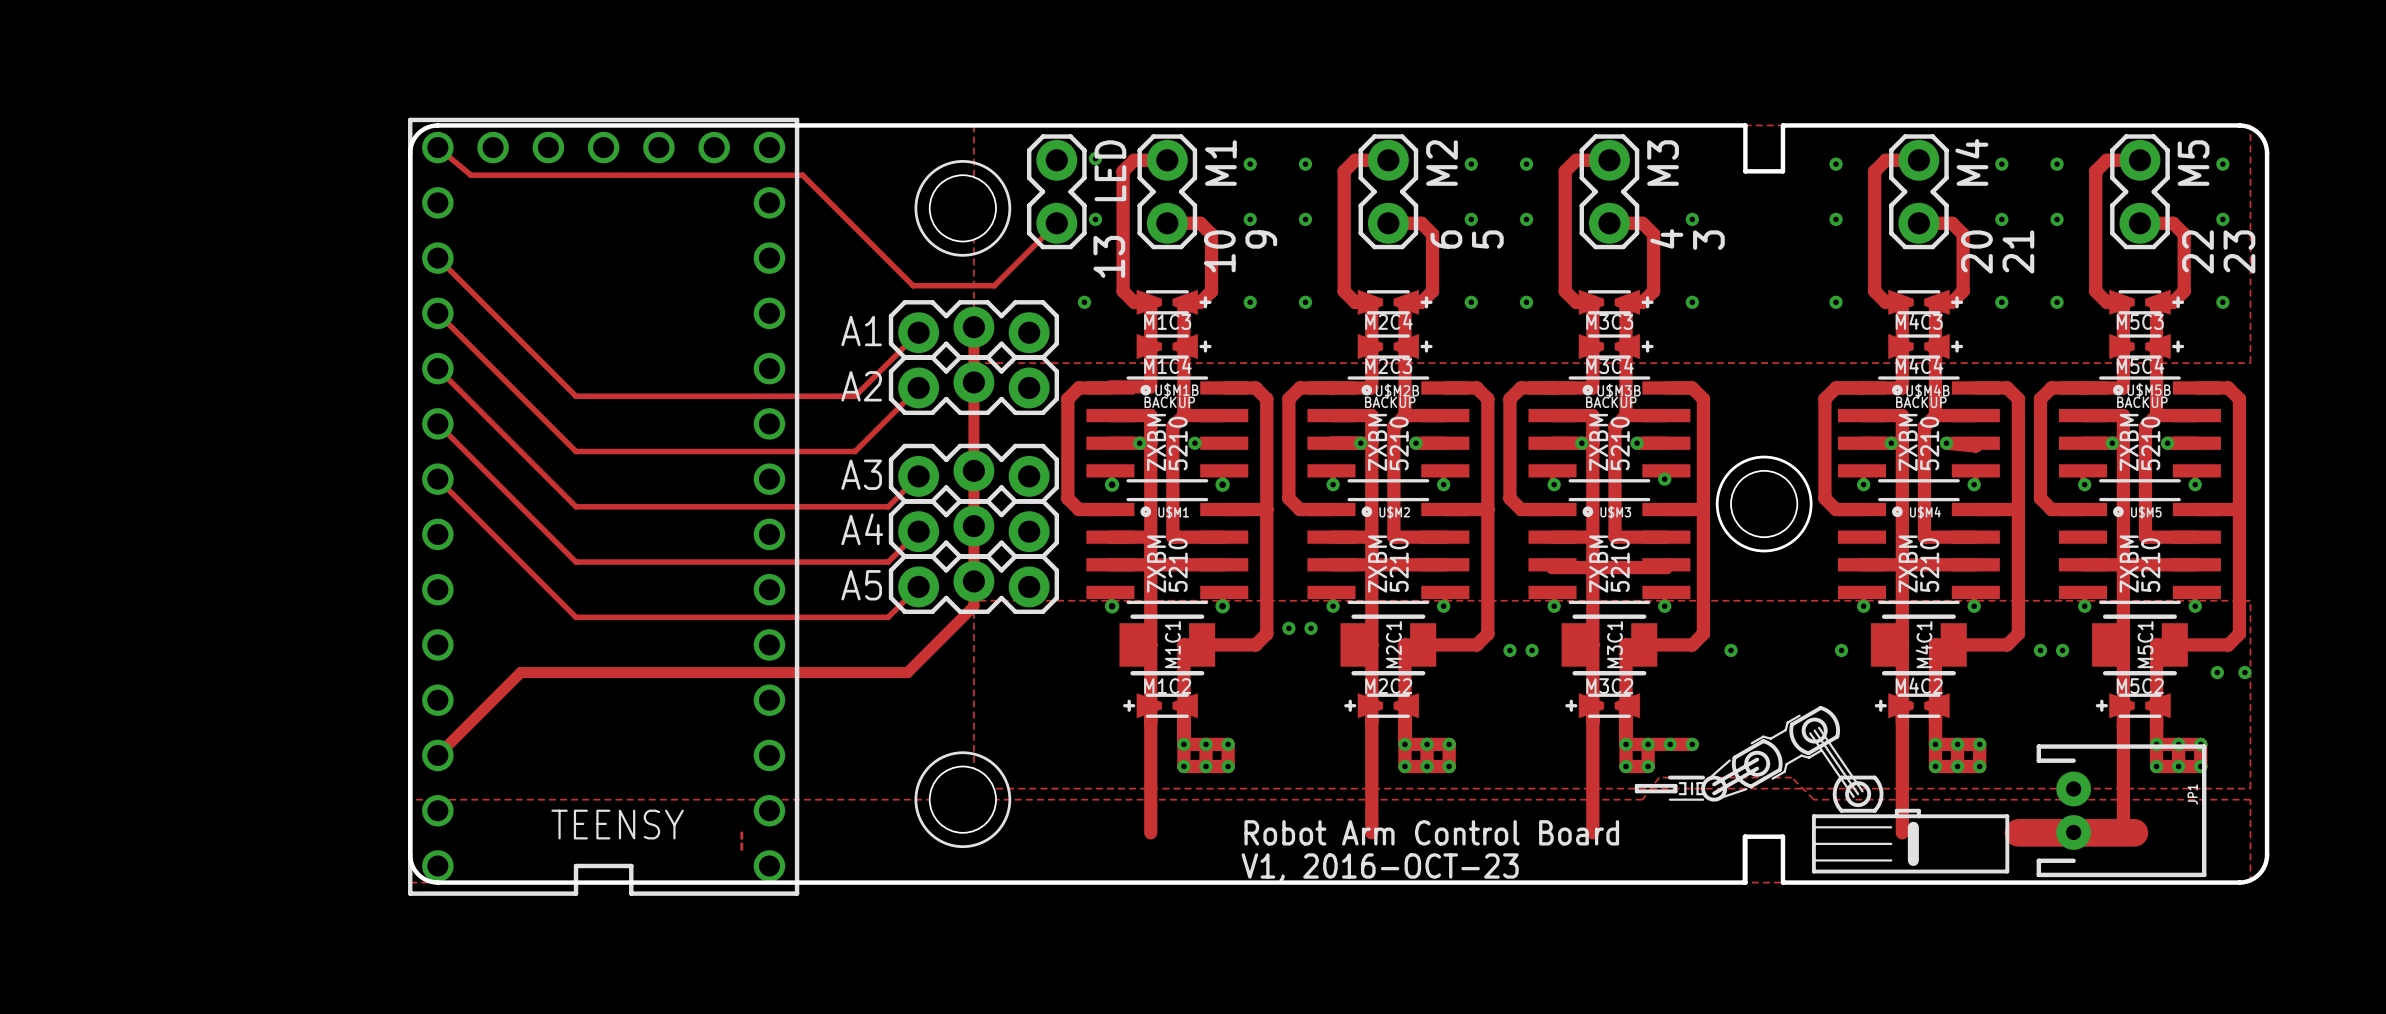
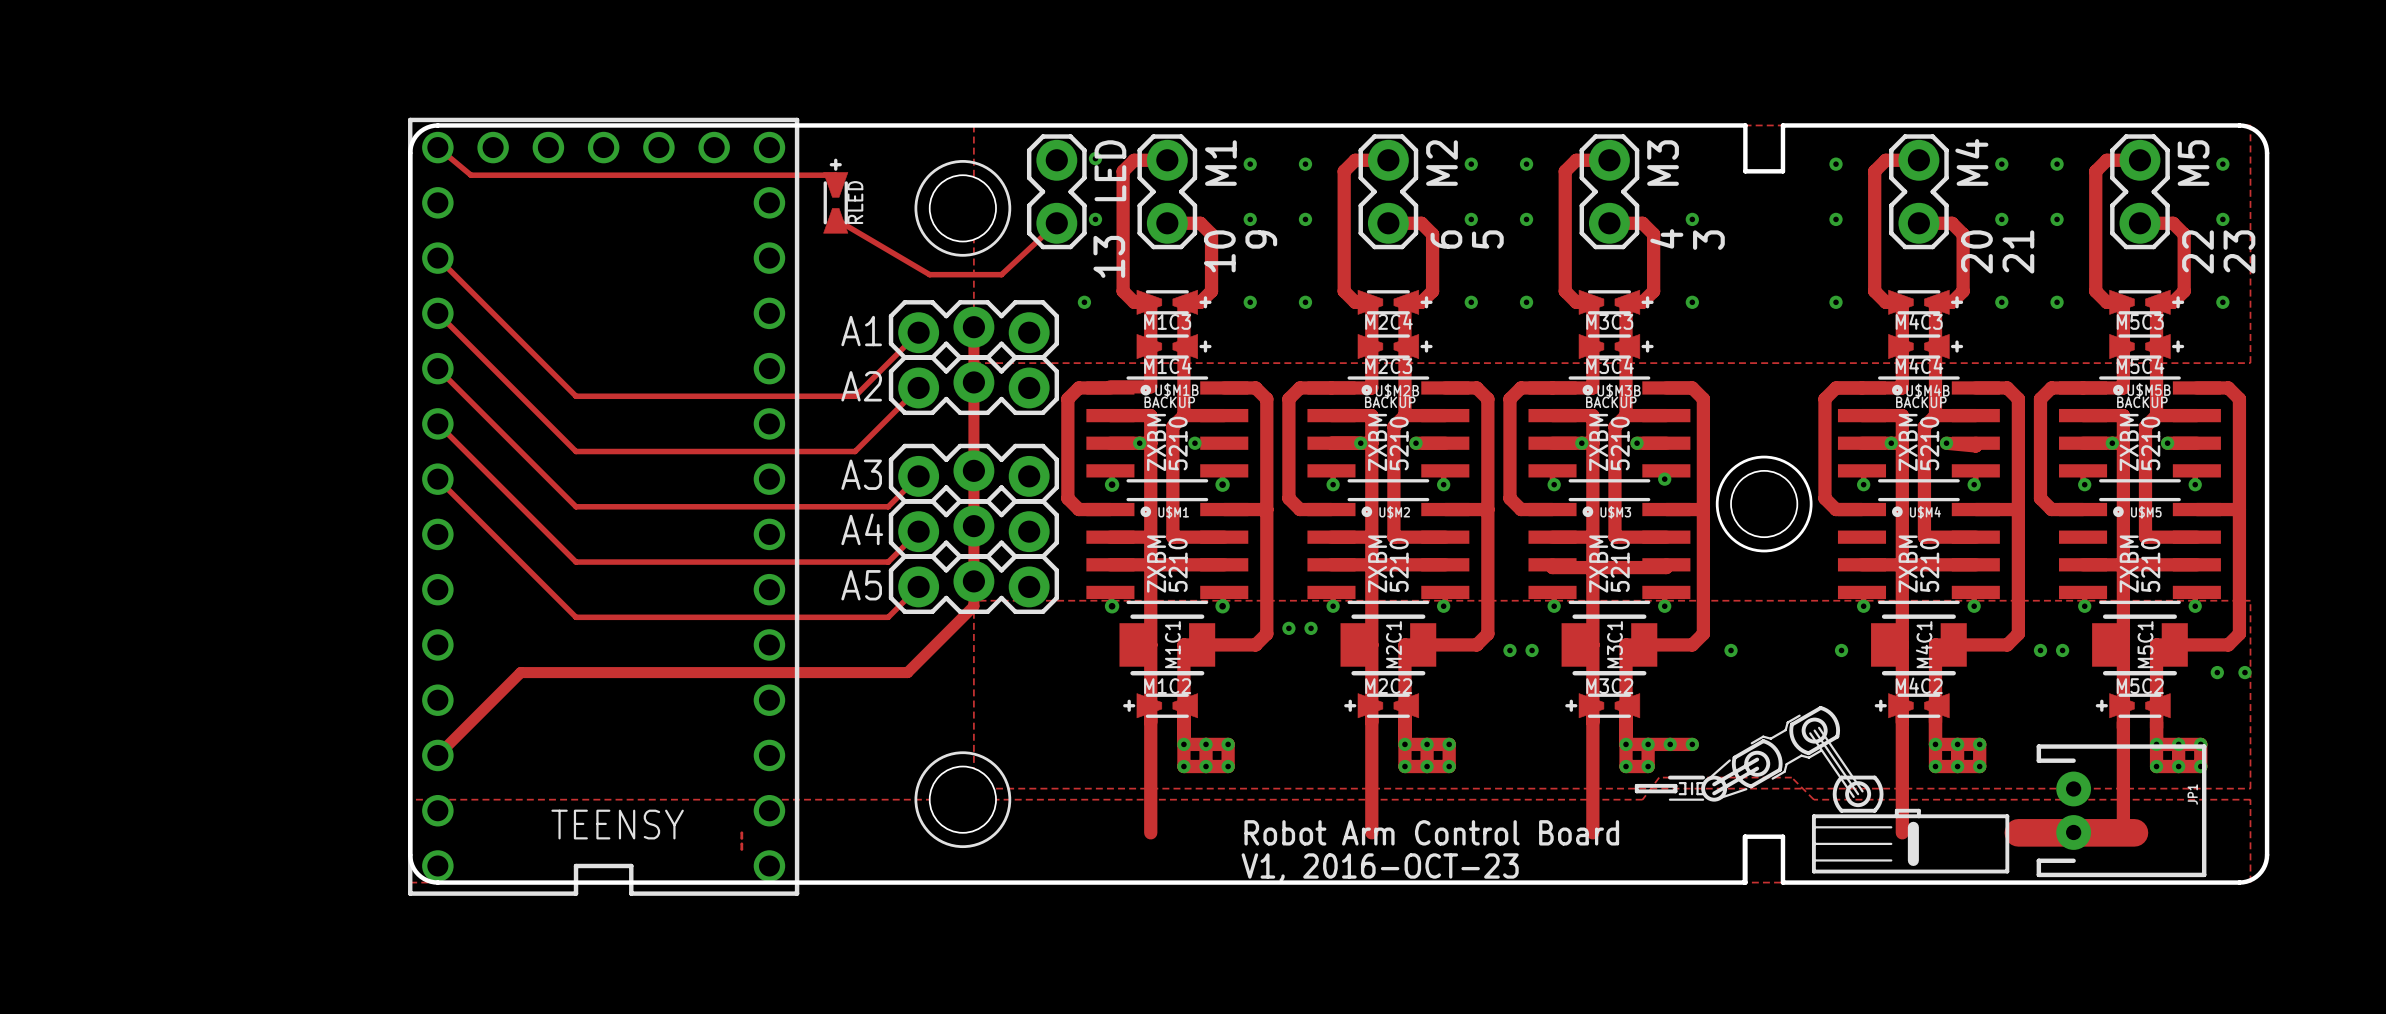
track: (802, 175) (913, 285) (994, 285) (1056, 223) -> (835, 219) (929, 274) (1001, 274) (1056, 223)
track: none -> (802, 175) (835, 175) (835, 186)
RLED: none -> (835, 196)

